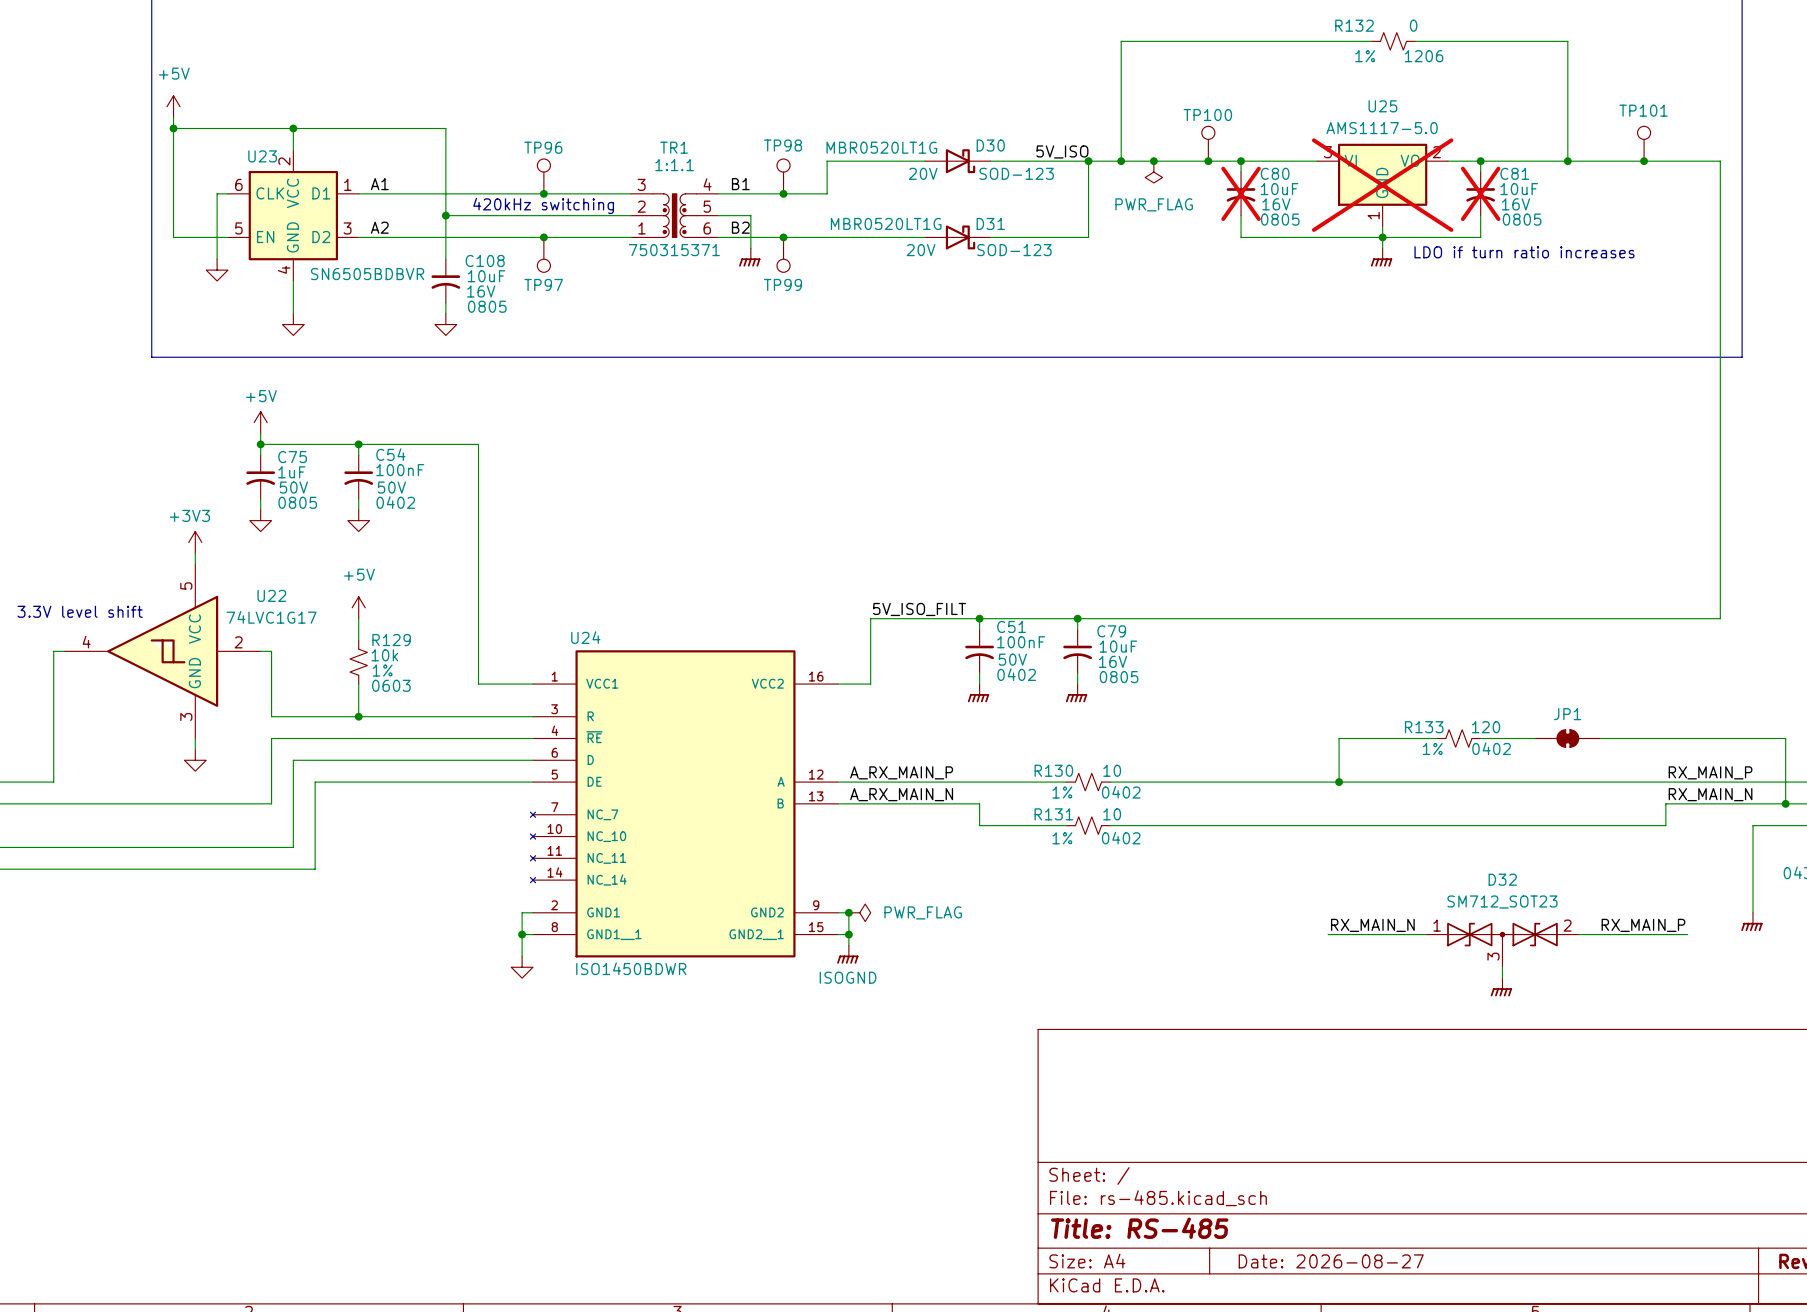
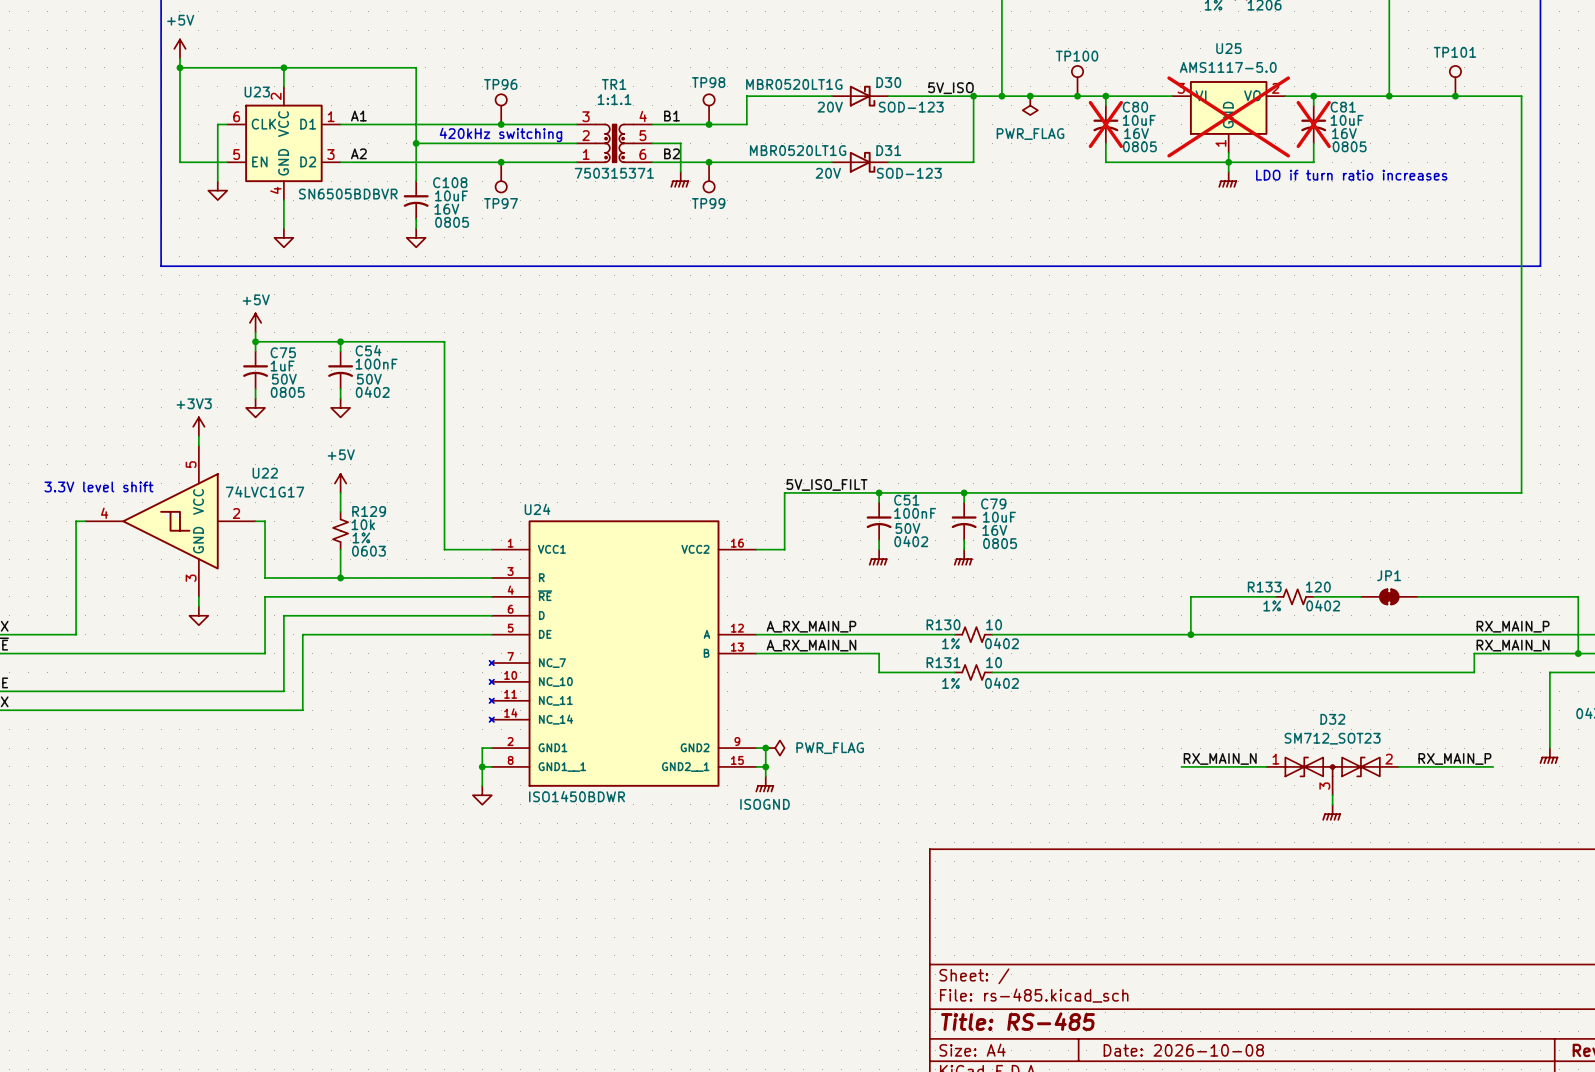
title block: Date: 2026-08-27 (1331, 1261) -> Date: 2026-10-08 (1183, 1050)

